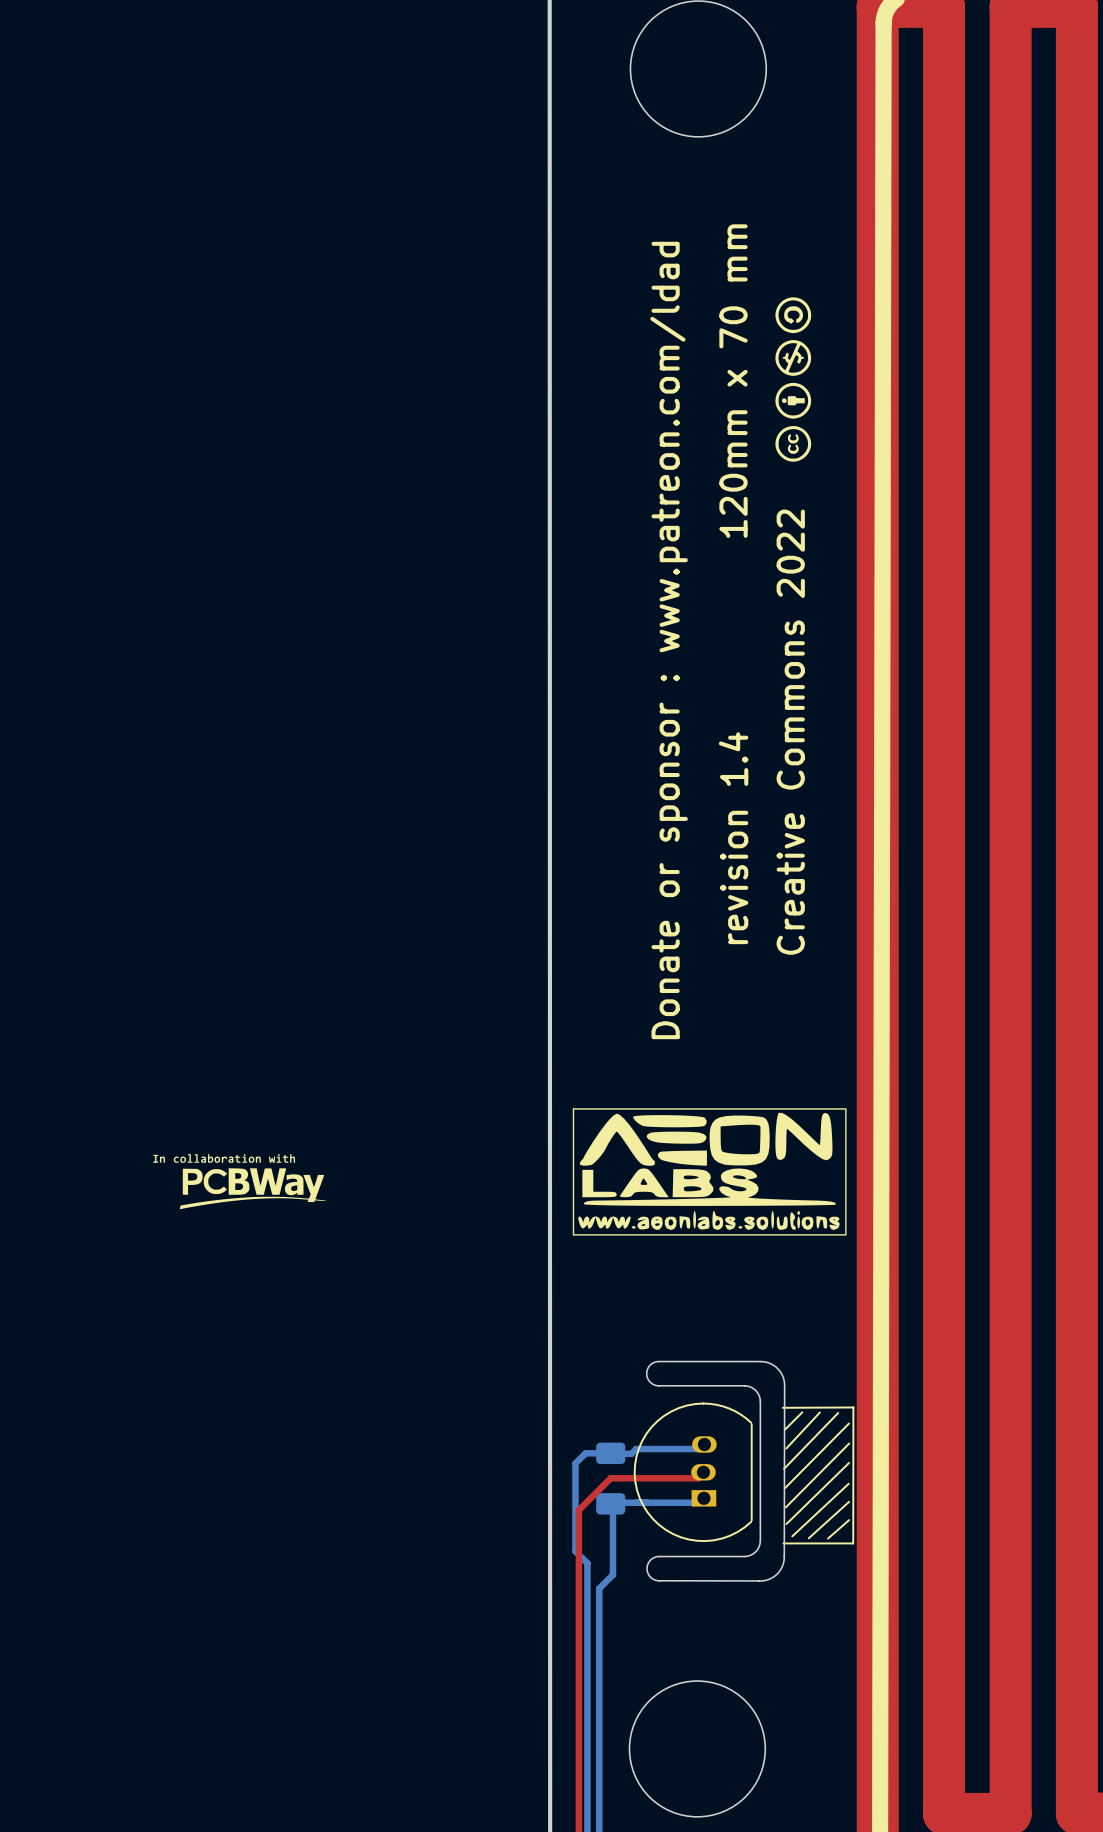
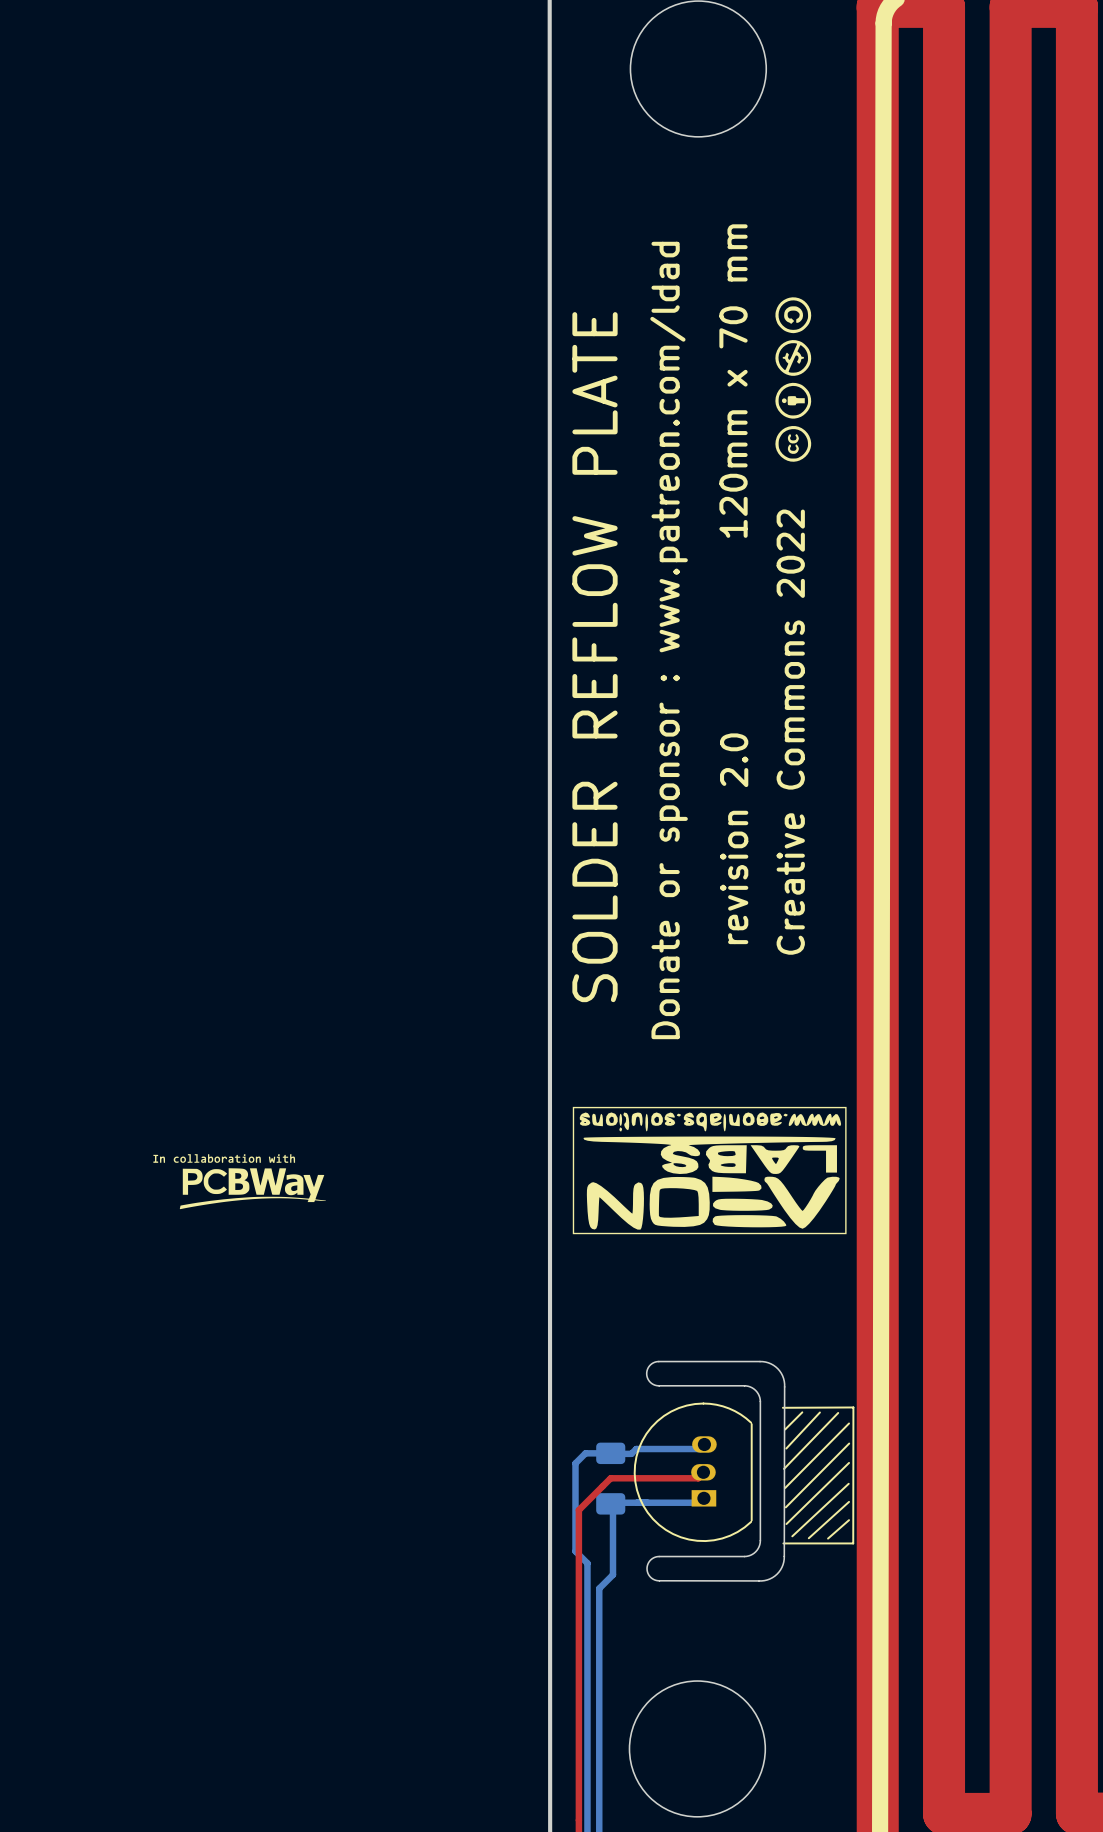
text: none -> SOLDER REFLOW PLATE (594, 657)
text: revision 1.4 (733, 838) -> revision 2.0 (734, 838)
drawing shape: [572, 1108, 847, 1236] -> [572, 1106, 847, 1235]

